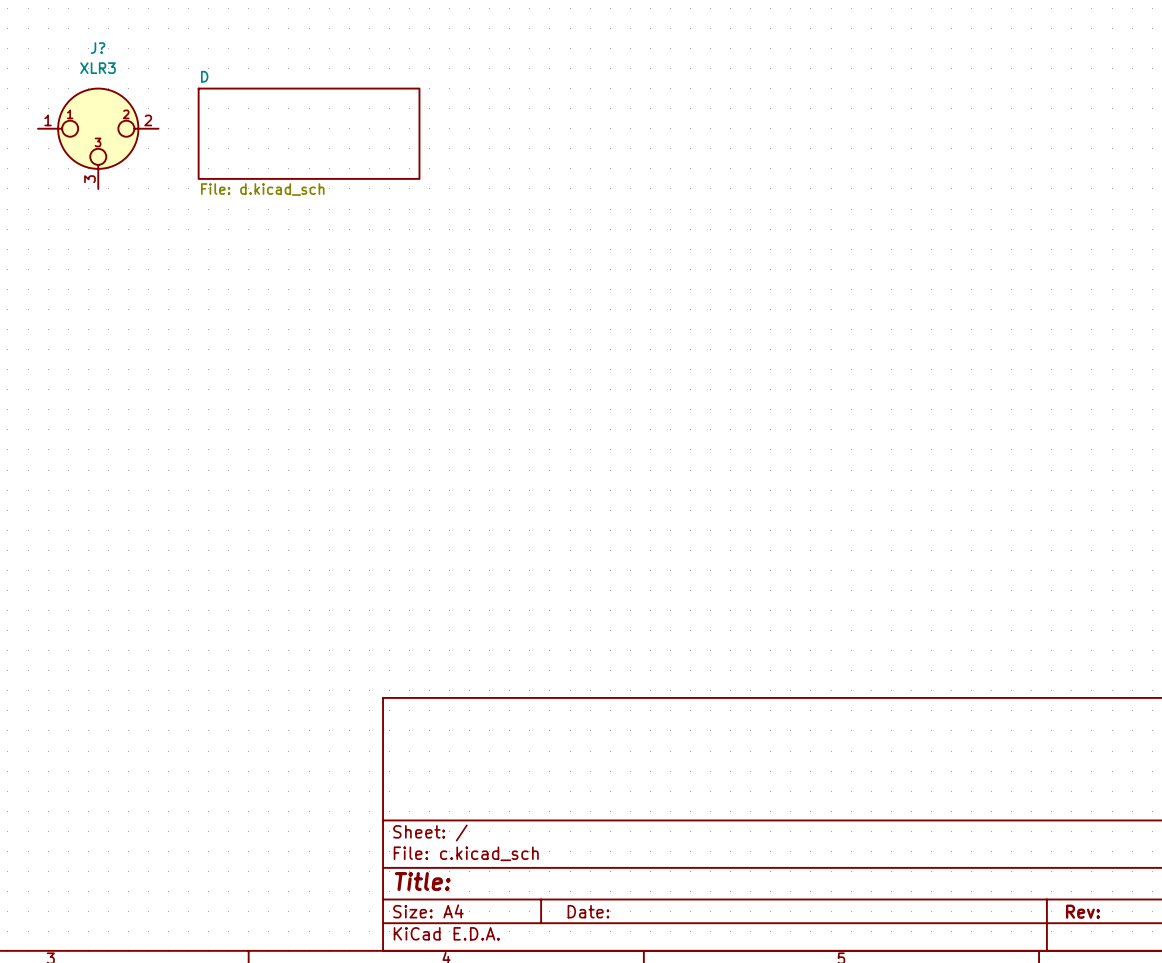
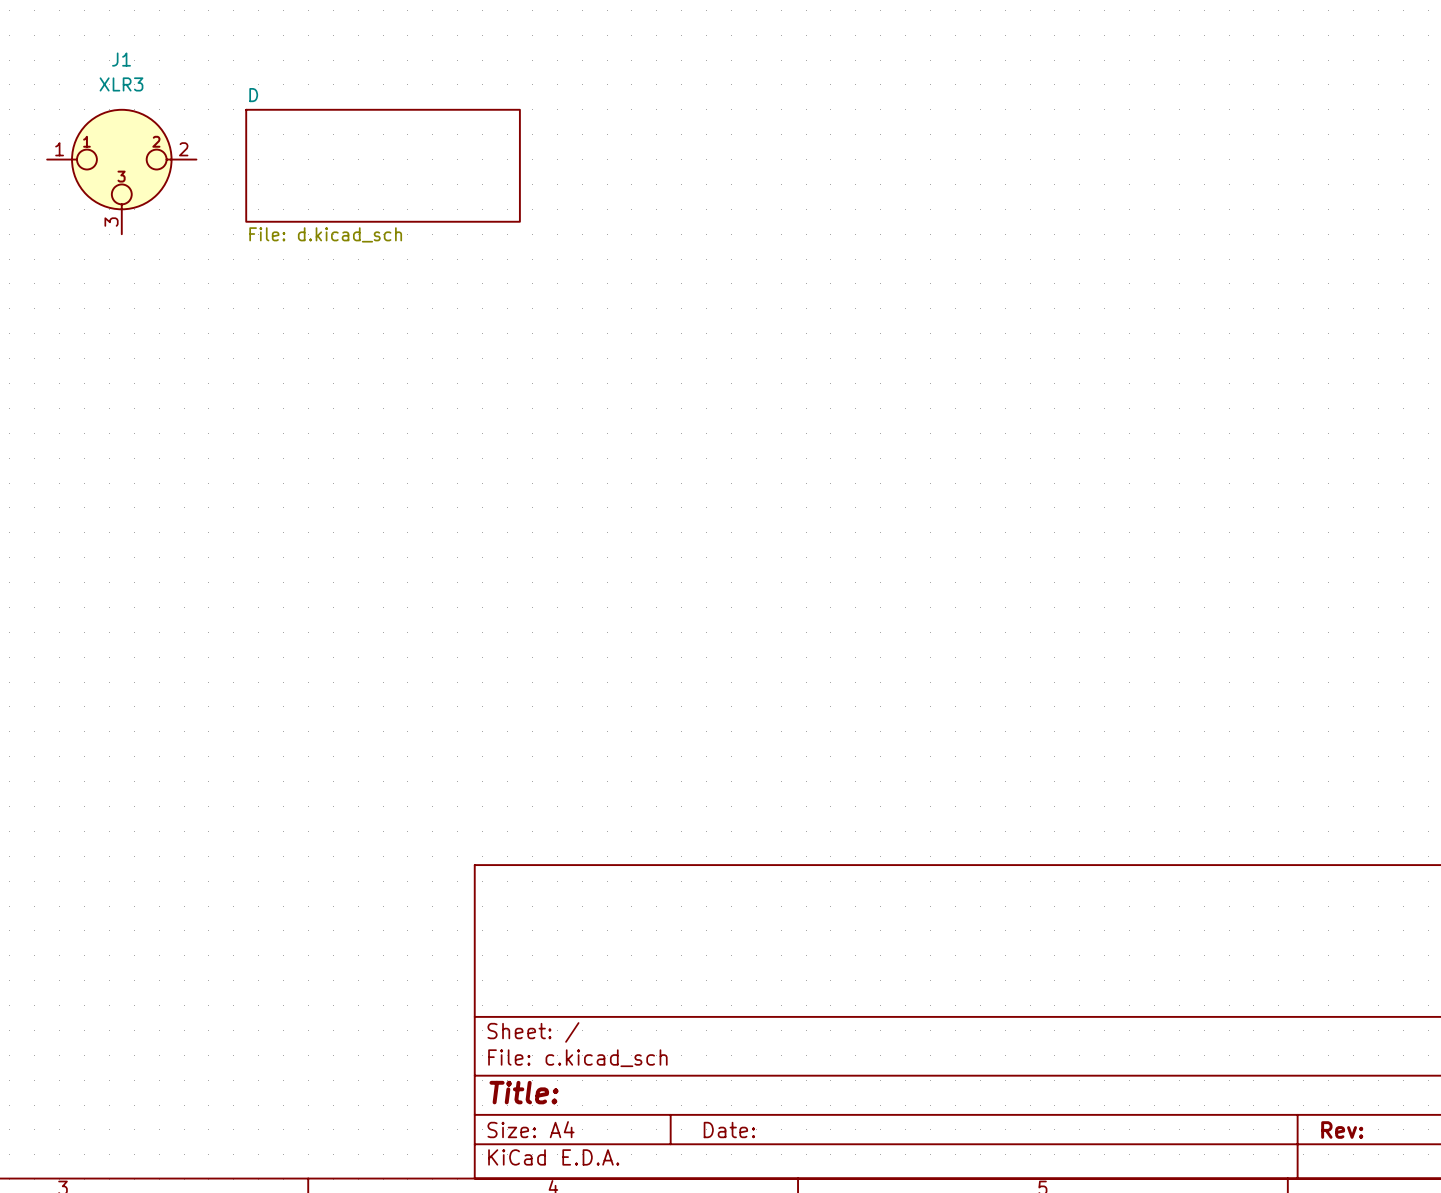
J? name: J? (98, 48) -> J1 (121, 59)

